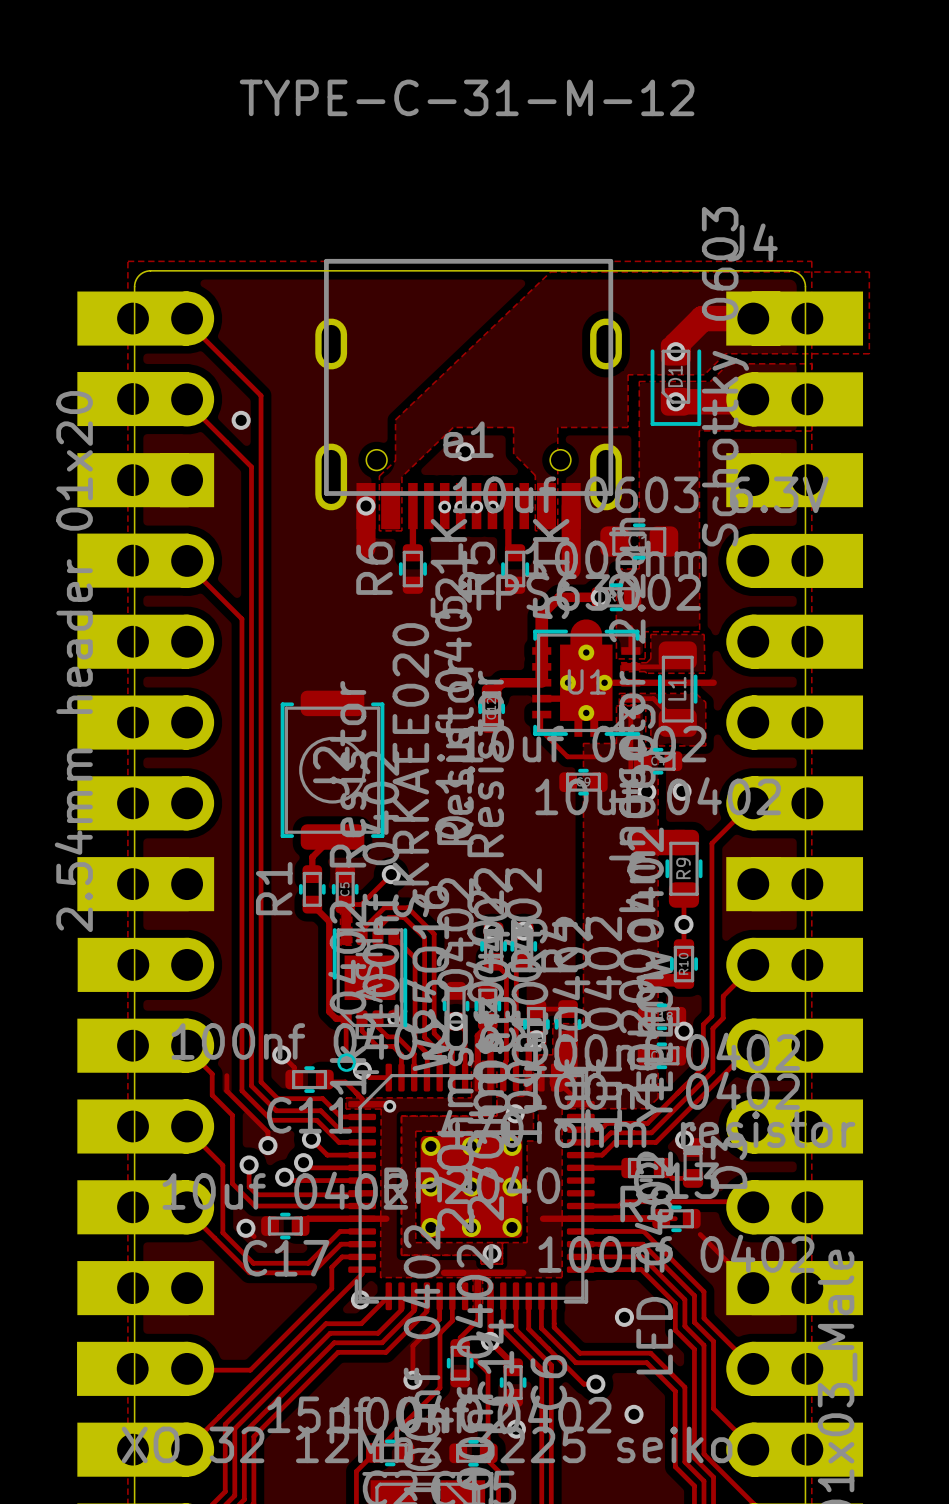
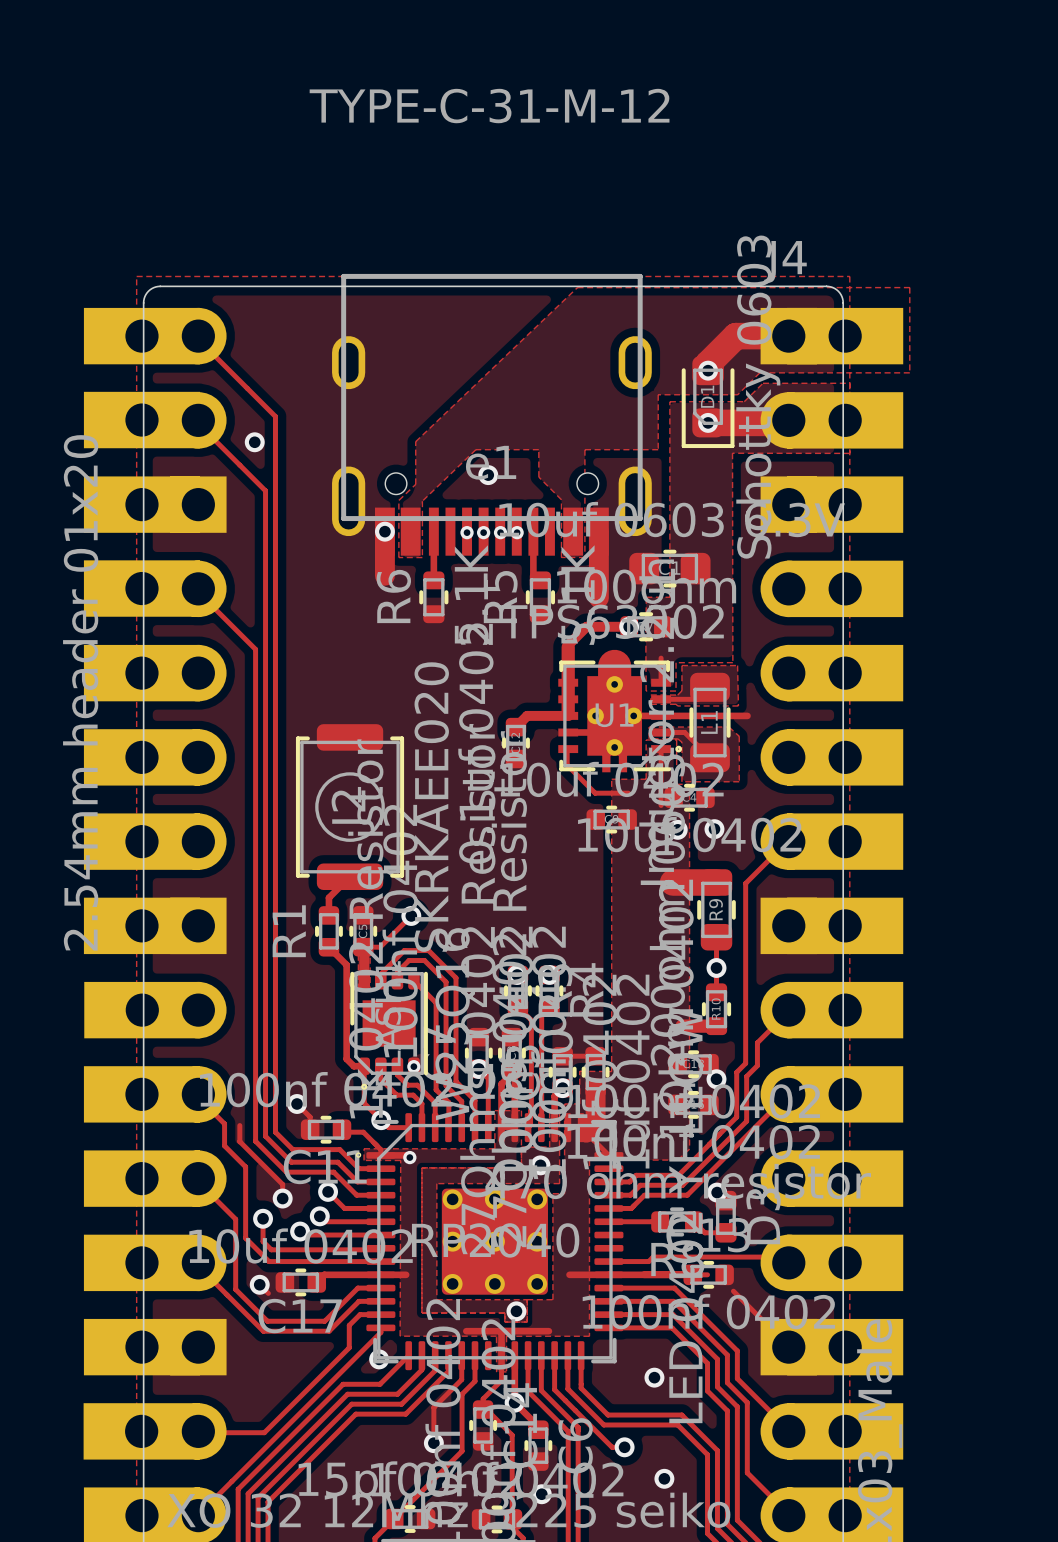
drawing: none -> [675, 745, 683, 753]
drawing: none -> [361, 1083, 368, 1090]
drawing: [337, 1053, 356, 1072] -> none
drawing: none -> [355, 1152, 362, 1158]

